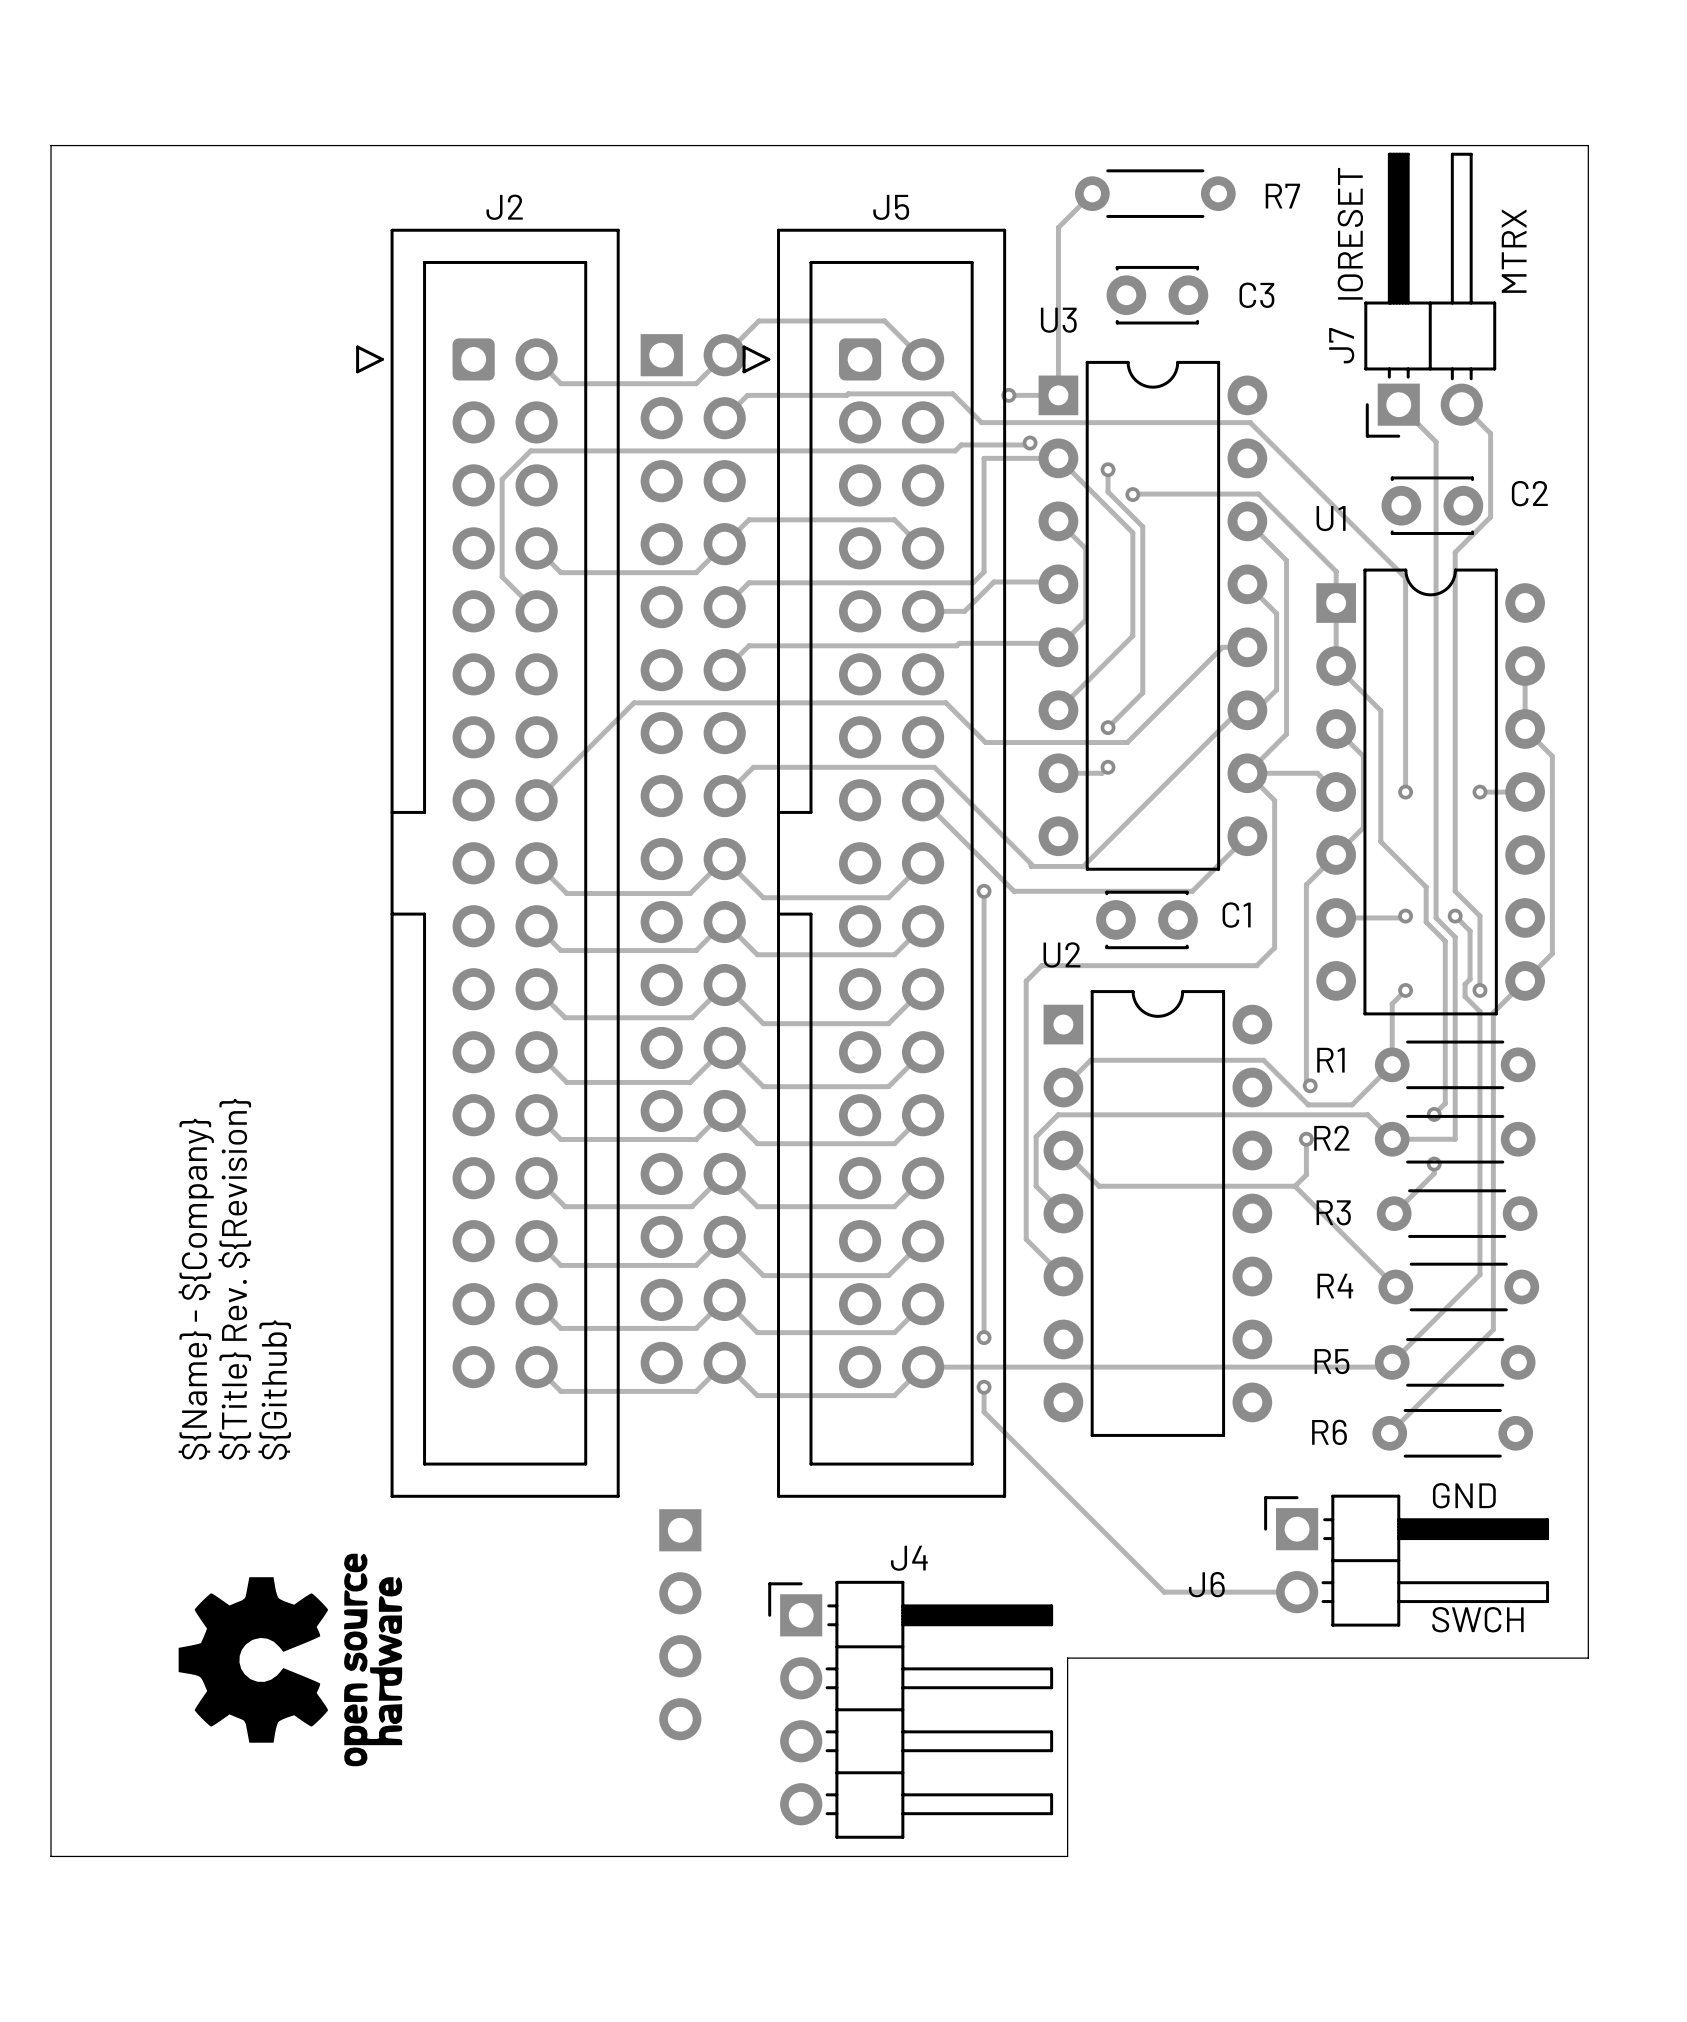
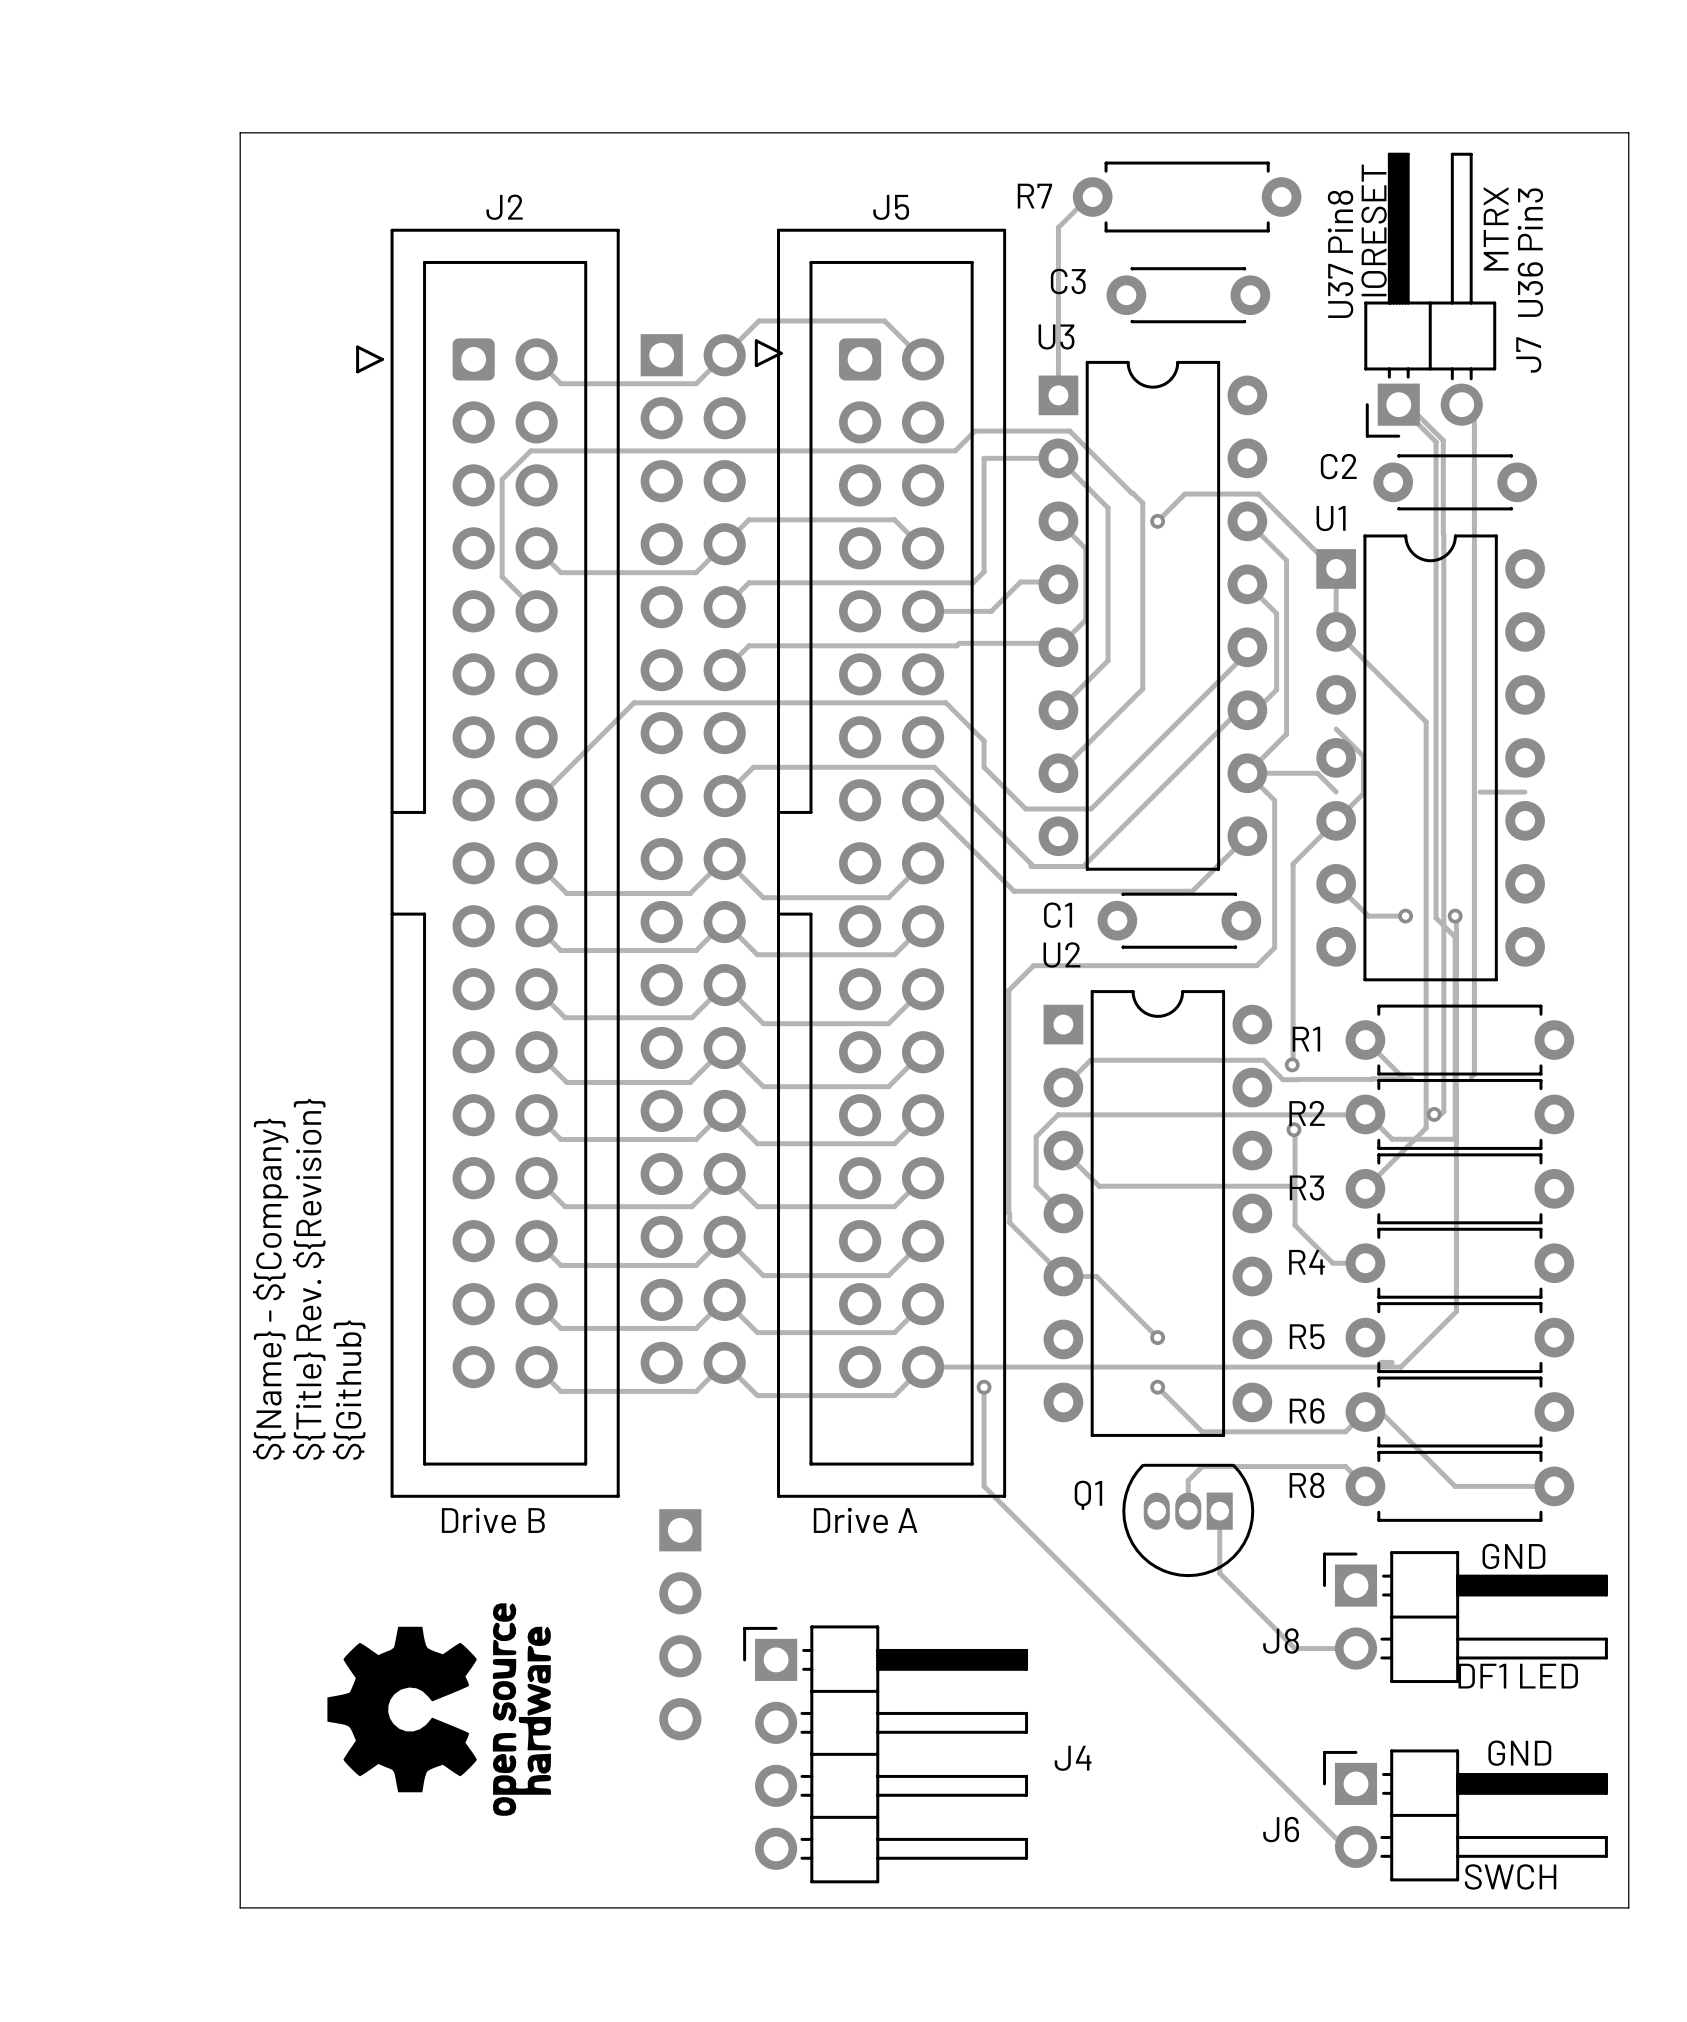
board edge: (51, 145) (1588, 145) (1588, 1658) (1067, 1658) (1067, 1856) (51, 1856) (51, 145) -> (240, 132) (240, 1907) (1628, 1907) (1628, 132) (240, 132)
R7 footprint: [1075, 169, 1236, 218] -> [1072, 161, 1302, 233]
R7 name position: R7 (1282, 196) -> R7 (1034, 196)
J5 footprint: [742, 228, 1007, 1498] -> [754, 228, 1007, 1498]
text position: IORESET (1350, 233) -> IORESET (1374, 230)
text position: MTRX (1514, 251) -> MTRX (1496, 228)
text: none -> U36 Pin3 (1530, 252)
text: none -> U37 Pin8 (1340, 254)
C3 footprint: [1106, 265, 1209, 325] -> [1106, 267, 1271, 324]
C3 name position: C3 (1256, 295) -> C3 (1068, 281)
U3 name position: U3 (1058, 320) -> U3 (1056, 336)
J7 name position: J7 (1341, 345) -> J7 (1528, 354)
track: (1008, 395) (1058, 395) -> none
via: (1008, 395) -> none
track: none -> (1405, 402) (1443, 440) (1443, 1111) (1441, 1114)
track: none -> (1468, 402) (1474, 408) (1474, 1074) (1471, 1077)
track: (1461, 404) (1490, 433) (1490, 517) (1455, 552) (1455, 891) (1479, 916) (1479, 990) -> none
track: (724, 418) (747, 395) (952, 393) (981, 422) (1250, 422) (1405, 577) (1405, 792) -> none
via: (1030, 443) -> none
track: (961, 444) (1033, 444) -> (961, 444) (975, 431) (1069, 431) (1142, 503) (1142, 526)
track: (1108, 469) (1108, 491) (1142, 526) -> none
via: (1108, 469) -> none
C2 footprint: [1381, 476, 1484, 535] -> [1373, 454, 1538, 511]
C2 name position: C2 (1529, 493) -> C2 (1338, 466)
via: (1132, 494) -> none
track: (1184, 494) (1132, 494) -> (1184, 494) (1157, 521)
track: (1108, 507) (1132, 532) (1132, 635) (1108, 660) -> (1108, 507) (1108, 660)
via: none -> (1157, 521)
track: (1020, 581) (993, 581) (964, 611) -> (1020, 581) (991, 611) (964, 611)
track: (1336, 631) (1336, 666) (1380, 710) (1380, 841) (1426, 887) -> (1336, 631) (1426, 721) (1426, 887)
track: (1247, 647) (1222, 647) (1127, 742) (985, 742) (984, 740) -> (1247, 647) (1247, 652) (1091, 808) (1025, 808) (984, 767) (984, 740)
track: (1525, 666) (1525, 729) (1552, 756) (1552, 953) (1493, 1012) (1493, 1329) (1389, 1433) -> none
track: (1142, 688) (1142, 692) (1108, 727) -> (1142, 688) (1058, 773)
via: (1108, 727) -> none
track: (1108, 767) (1102, 773) (1058, 773) -> none
via: (1108, 767) -> none
U1 position: (1430, 791) -> (1430, 757)
via: (1405, 792) -> none
via: (1479, 792) -> none
track: (1363, 793) (1363, 827) (1306, 884) (1306, 1081) (1310, 1085) -> (1363, 793) (1293, 863) (1292, 1064)
C1 footprint: [1096, 890, 1198, 950] -> [1097, 892, 1262, 949]
track: (984, 891) (984, 1337) -> none
via: (984, 891) -> none
C1 name position: C1 (1236, 915) -> C1 (1058, 915)
track: (1405, 916) (1403, 917) (1336, 917) -> (1405, 916) (1368, 916) (1336, 883)
track: (1455, 916) (1470, 930) (1470, 979) (1465, 984) (1465, 996) (1479, 1011) (1479, 1274) (1387, 1367) -> (1459, 916) (1456, 919) (1456, 1311) (1400, 1367) (1387, 1367)
track: (1426, 922) (1445, 941) (1445, 1103) (1434, 1114) -> (1426, 922) (1426, 1128) (1365, 1188)
track: (1041, 965) (1026, 981) (1026, 1239) -> (1041, 965) (1033, 965) (1008, 990) (1008, 1212) (1009, 1222) (1026, 1239)
track: (1405, 990) (1392, 1003) (1392, 1064) (1352, 1104) (1308, 1104) (1283, 1079) -> (1298, 1079) (1283, 1079)
via: (1405, 990) -> none
via: (1479, 990) -> none
track: none -> (1365, 1040) (1404, 1078)
R1 footprint: [1374, 1040, 1536, 1090] -> [1345, 1004, 1575, 1076]
via: none -> (1292, 1064)
track: none -> (1411, 1078) (1298, 1079)
via: (1310, 1085) -> none
R2 footprint: [1374, 1114, 1536, 1164] -> [1345, 1078, 1575, 1150]
track: none -> (1294, 1129) (1295, 1225) (1332, 1263) (1365, 1263)
track: (1306, 1139) (1306, 1174) (1295, 1186) (1395, 1287) -> none
via position: (1306, 1139) -> (1294, 1129)
track: (1434, 1164) (1434, 1173) (1394, 1213) -> none
via: (1434, 1164) -> none
R3 footprint: [1376, 1189, 1538, 1238] -> [1345, 1153, 1575, 1225]
R4 footprint: [1378, 1262, 1540, 1312] -> [1345, 1227, 1575, 1299]
track: none -> (1063, 1276) (1096, 1276) (1157, 1337)
text position: ${Title} Rev. ${Revision} (234, 1279) -> ${Title} Rev. ${Revision} (309, 1279)
text position: ${Name} - ${Company} (196, 1289) -> ${Name} - ${Company} (270, 1289)
via: (984, 1337) -> none
via: none -> (1157, 1337)
R5 footprint: [1374, 1338, 1536, 1387] -> [1345, 1302, 1575, 1374]
track: none -> (1157, 1387) (1202, 1431) (1345, 1431) (1365, 1411) (1380, 1411) (1455, 1486) (1554, 1486)
via: none -> (1157, 1387)
text position: ${Github} (274, 1390) -> ${Github} (349, 1390)
R6 footprint: [1372, 1409, 1534, 1458] -> [1345, 1376, 1575, 1448]
track: (984, 1411) (1164, 1592) (1297, 1592) -> (984, 1411) (984, 1486) (1345, 1847) (1355, 1846)
track: none -> (1365, 1486) (1345, 1466) (1202, 1466) (1188, 1480) (1188, 1511)
R8: none -> (1459, 1486)
text position: GND (1464, 1495) -> GND (1513, 1556)
track: none -> (1219, 1511) (1219, 1573) (1295, 1648) (1355, 1648)
text: none -> Drive B (493, 1520)
text: none -> Drive A (865, 1520)
Q1: none -> (1188, 1520)
J4 name position: J4 (909, 1558) -> J4 (1073, 1758)
J6 position: (1406, 1560) -> (1465, 1815)
J6 name position: J6 (1206, 1584) -> J6 (1281, 1829)
J8: none -> (1465, 1617)
text position: SWCH (1477, 1619) -> SWCH (1510, 1876)
drawing position: (290, 1659) -> (439, 1709)
text: none -> DF1 LED (1518, 1676)
J4 position: (910, 1709) -> (885, 1754)
text: none -> GND (1519, 1753)

